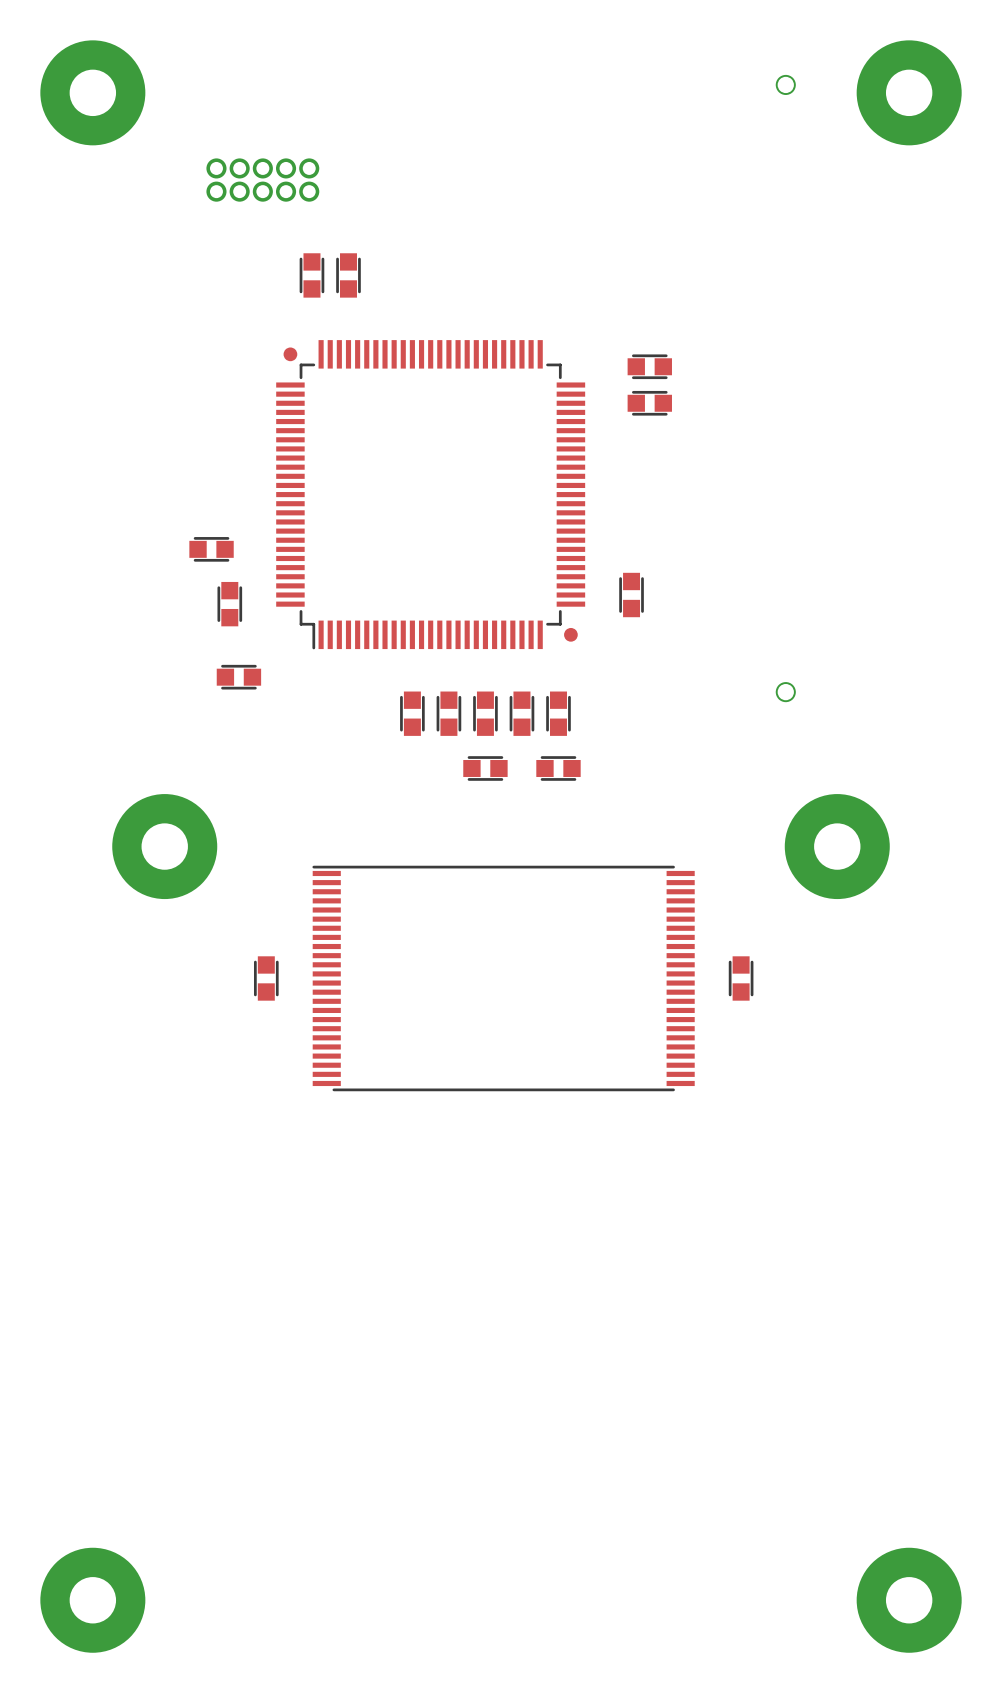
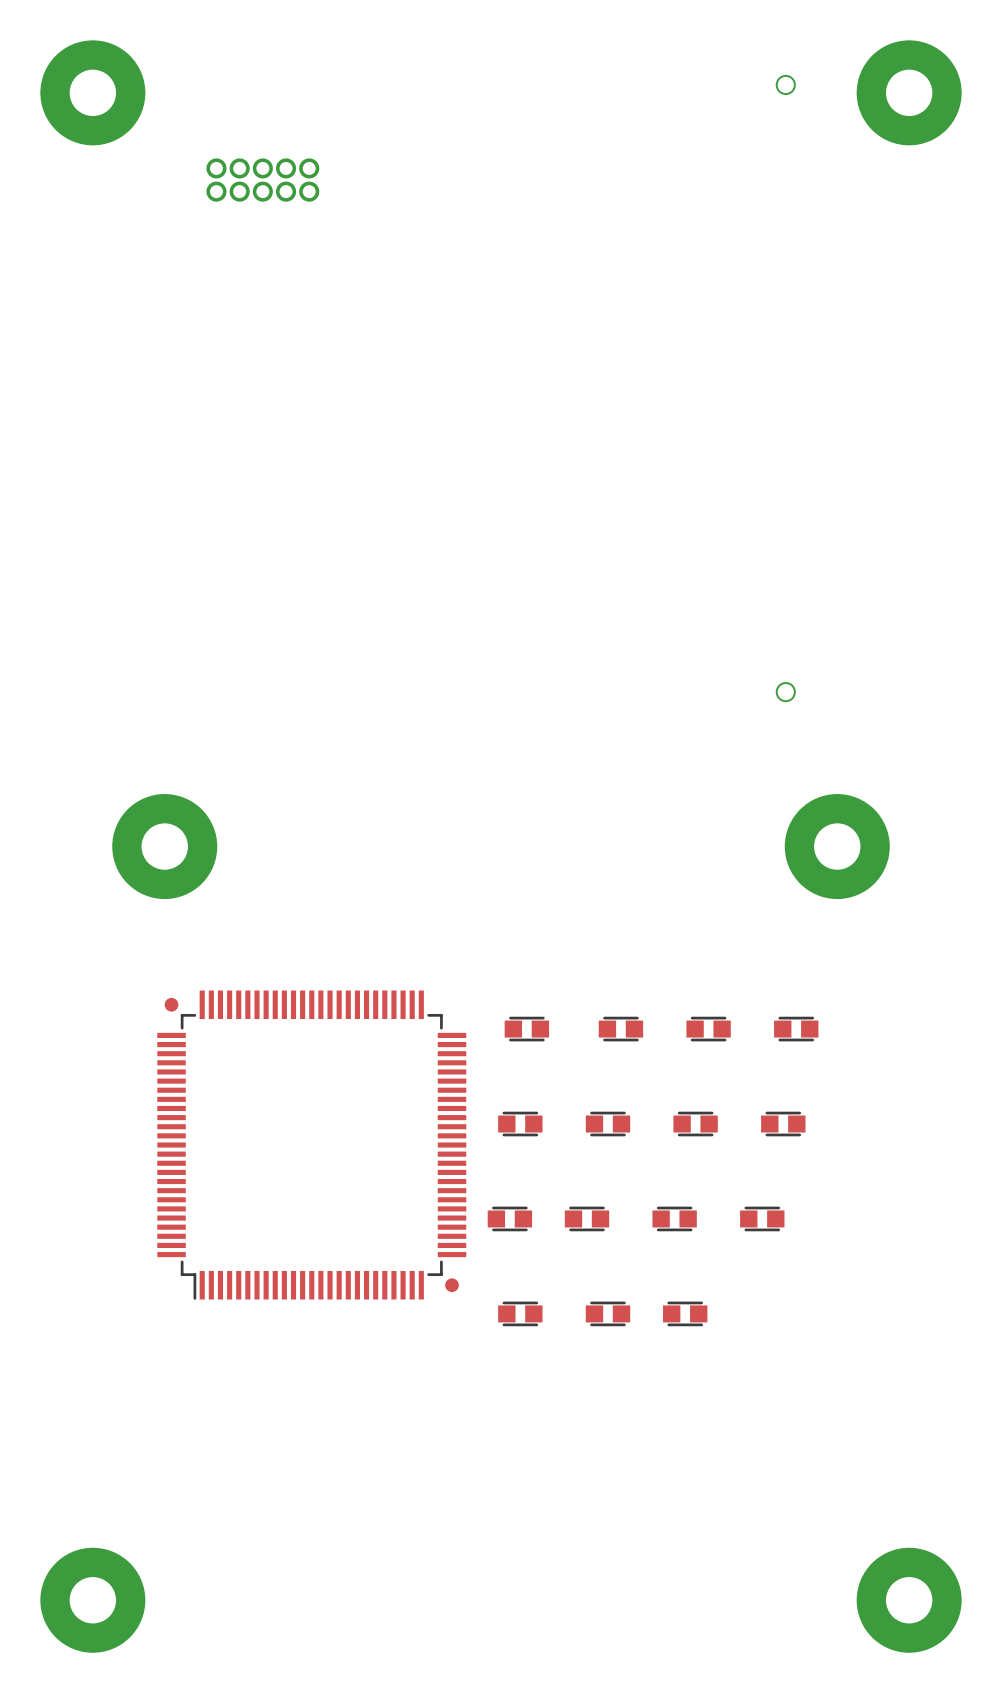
part: (311, 275) -> none
part: (348, 275) -> none
part: (649, 366) -> none
part: (649, 403) -> none
part: (430, 494) -> none
part: (211, 549) -> none
part: (631, 595) -> none
part: (229, 604) -> none
part: (238, 677) -> none
part: (412, 713) -> none
part: (448, 713) -> none
part: (485, 713) -> none
part: (521, 713) -> none
part: (558, 713) -> none
part: (485, 768) -> none
part: (558, 768) -> none
part: (266, 978) -> none
part: (503, 978) -> none
part: (741, 978) -> none
part: none -> (526, 1029)
part: none -> (620, 1029)
part: none -> (708, 1029)
part: none -> (796, 1029)
part: none -> (520, 1124)
part: none -> (607, 1124)
part: none -> (695, 1124)
part: none -> (783, 1124)
part: none -> (311, 1145)
part: none -> (509, 1218)
part: none -> (586, 1218)
part: none -> (674, 1218)
part: none -> (762, 1218)
part: none -> (520, 1313)
part: none -> (607, 1313)
part: none -> (685, 1313)

